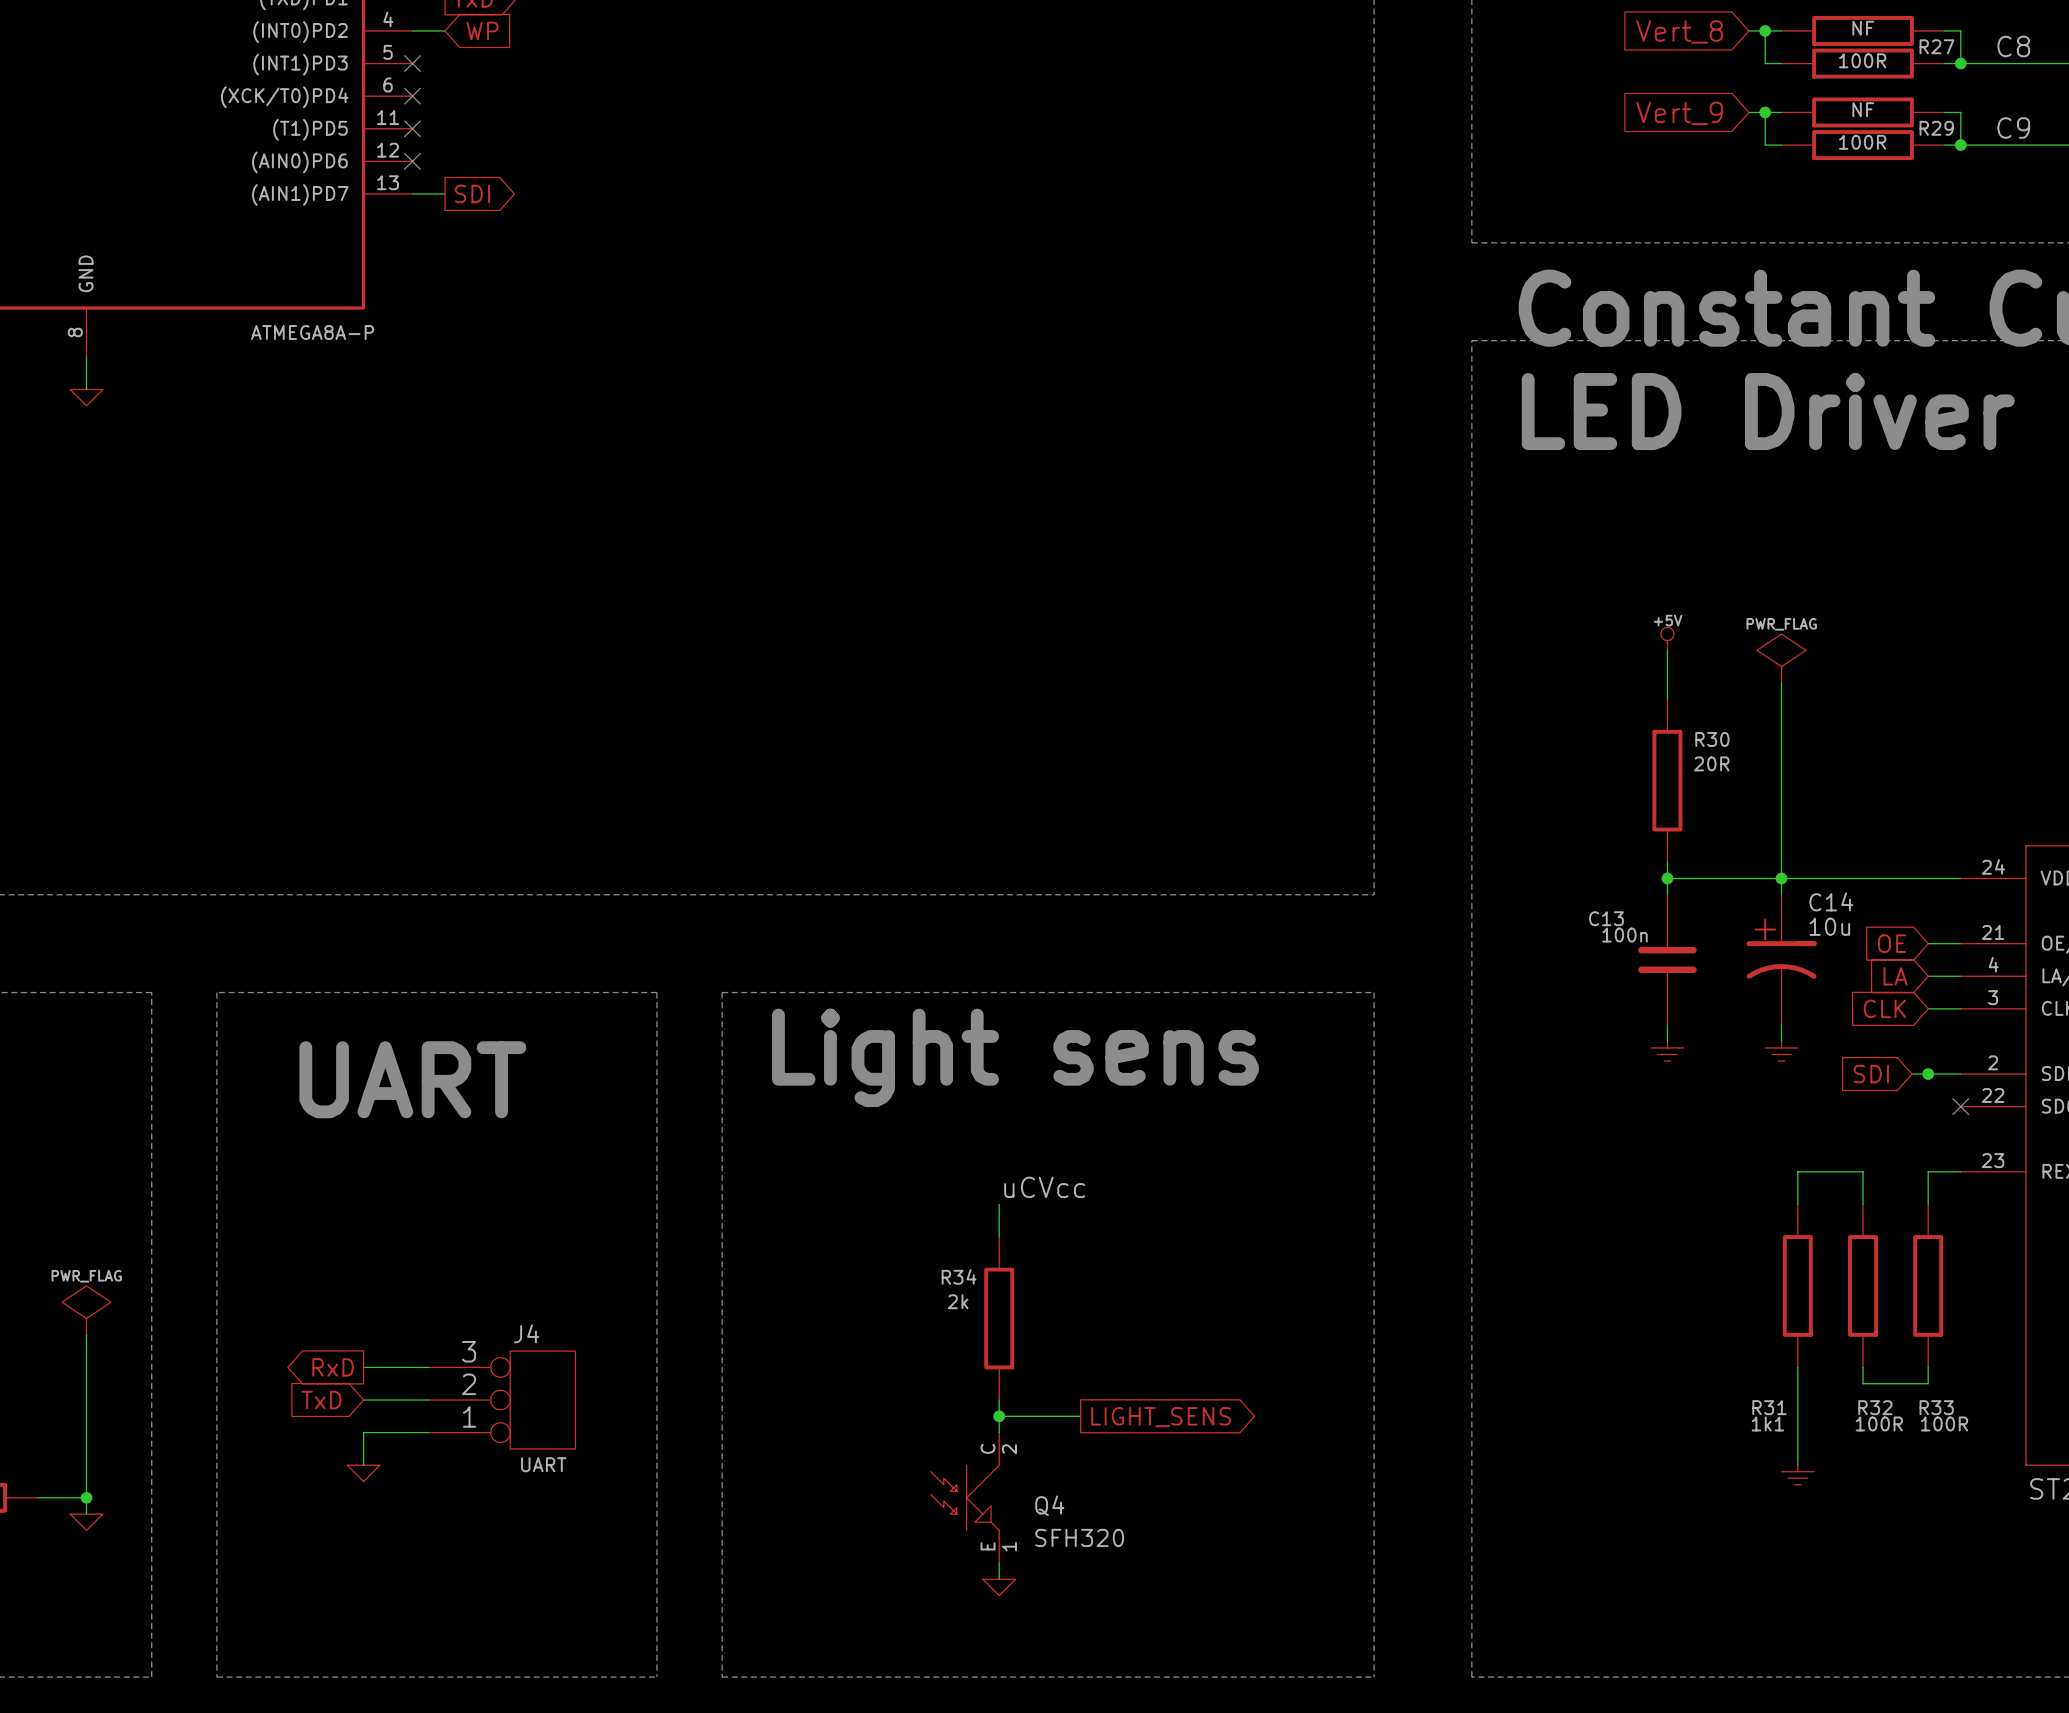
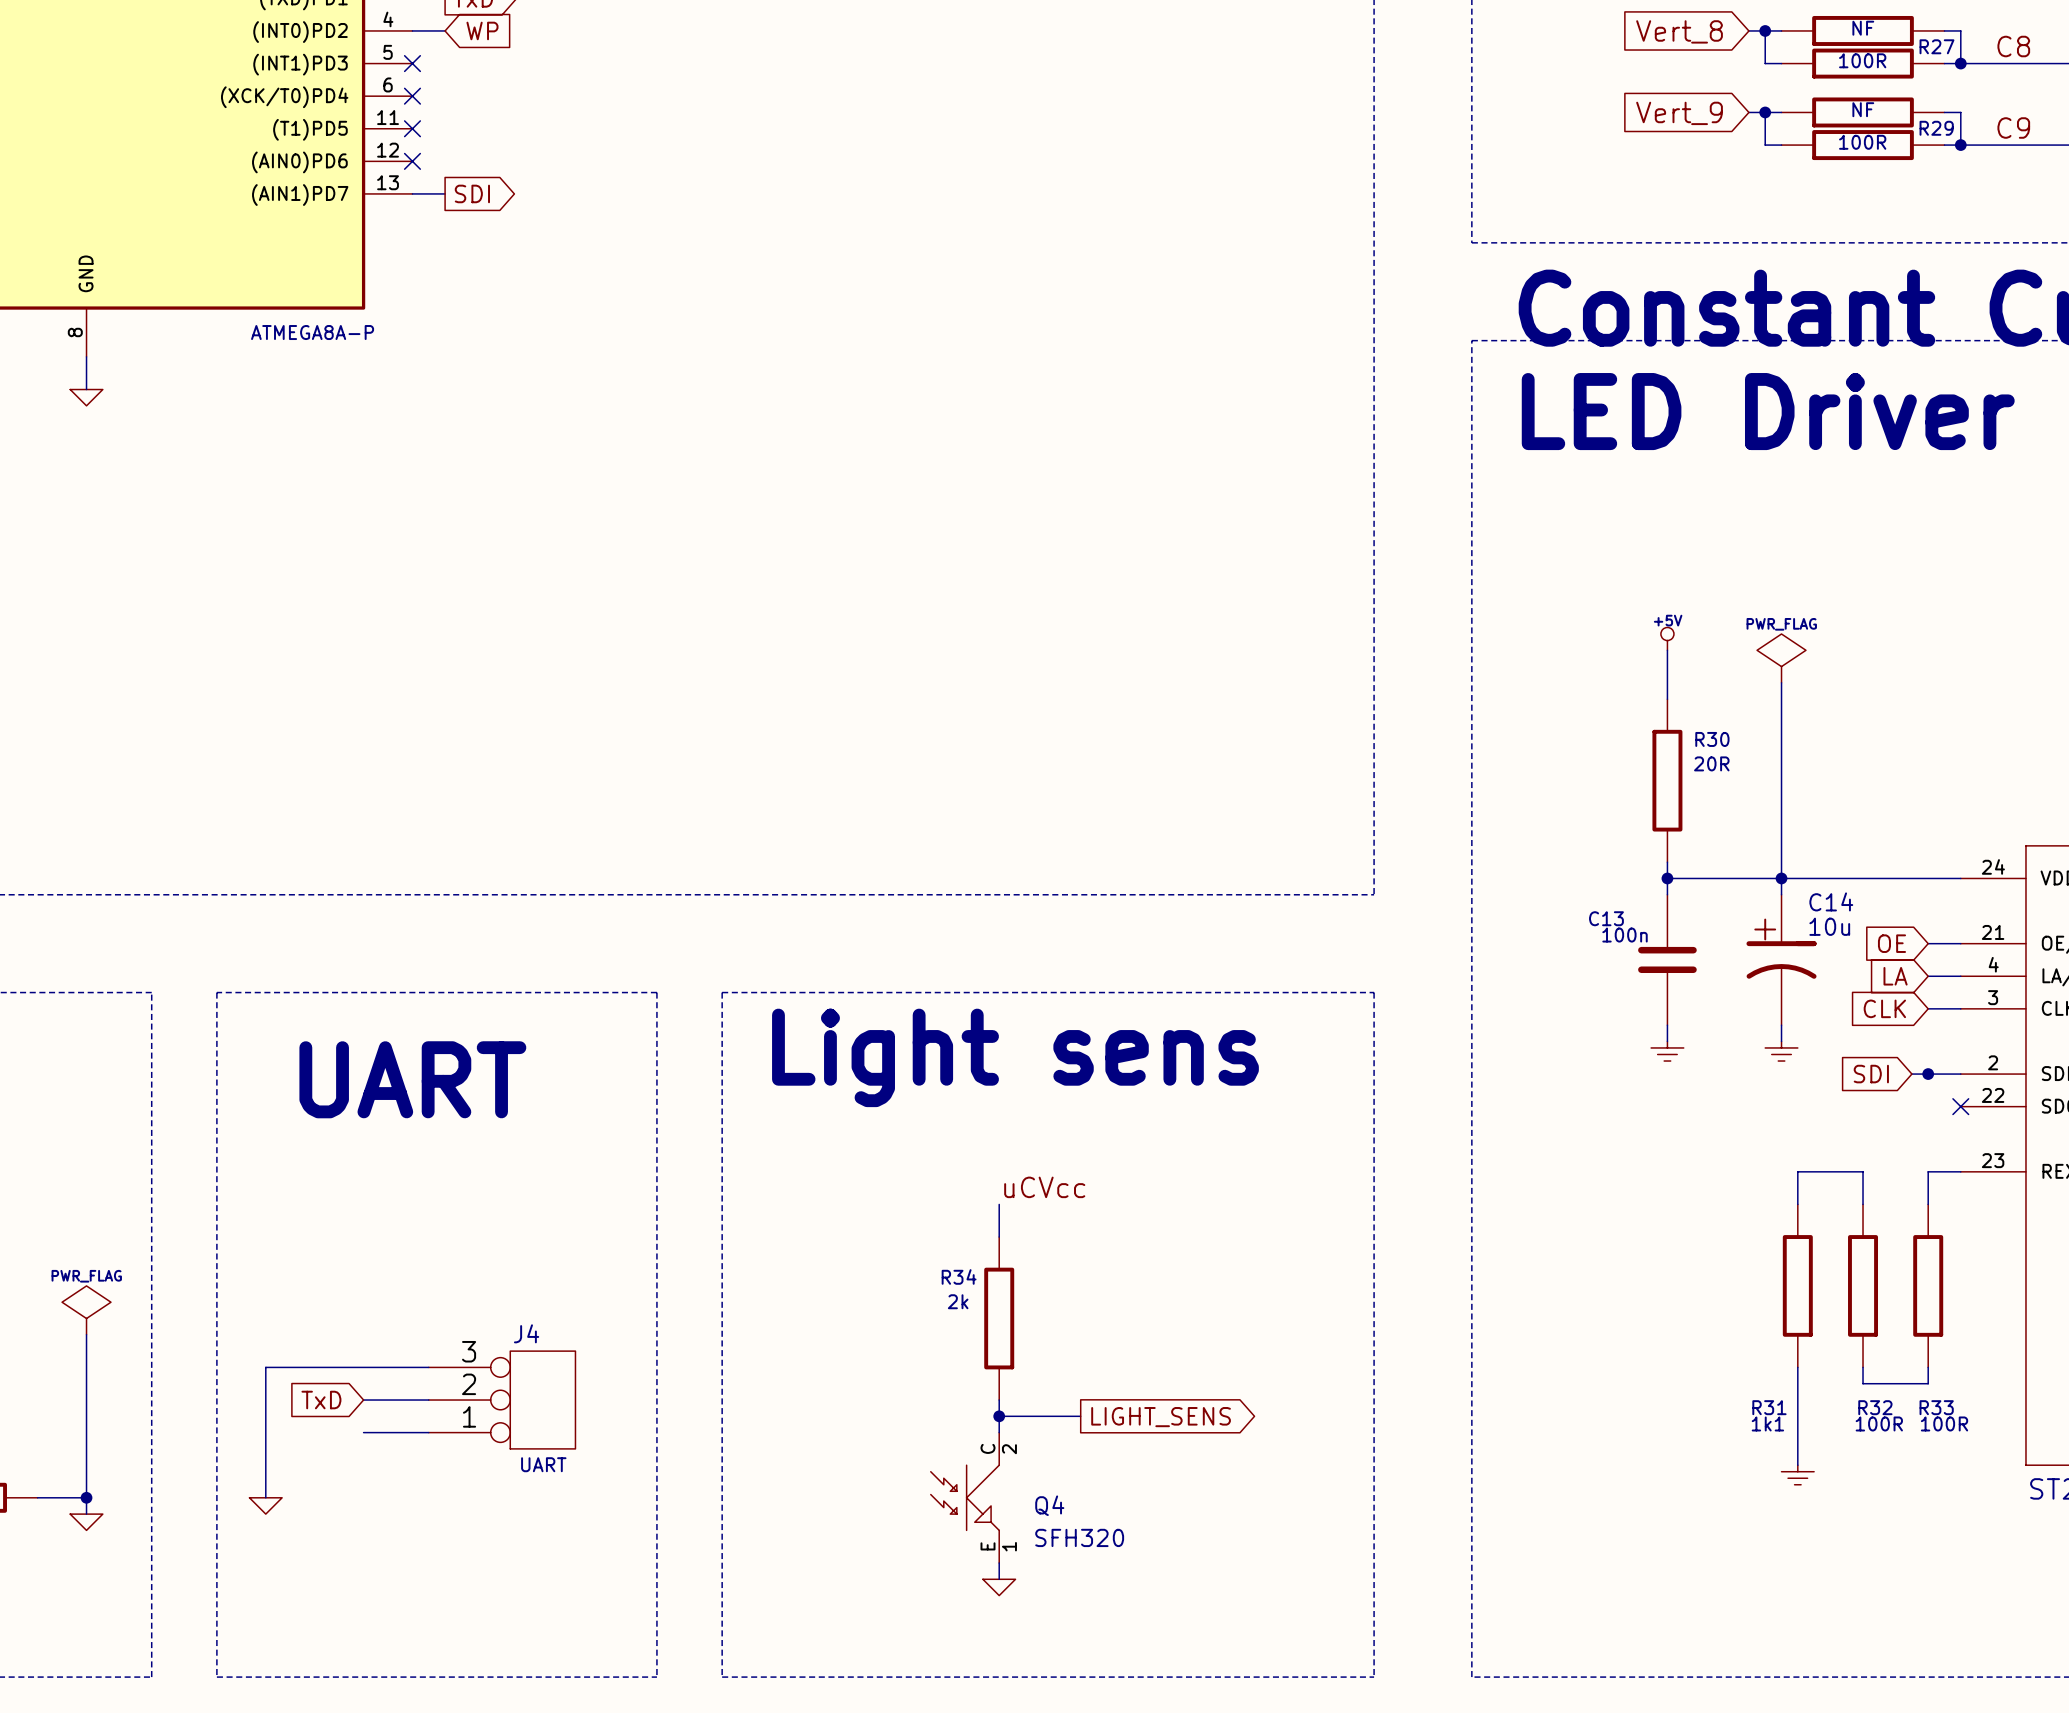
global label: RxD (333, 1367) -> none
wire: none -> (363, 1367) (265, 1367) (265, 1497)
wire: (363, 1432) (363, 1465) -> none
power symbol position: (363, 1473) -> (265, 1505)

